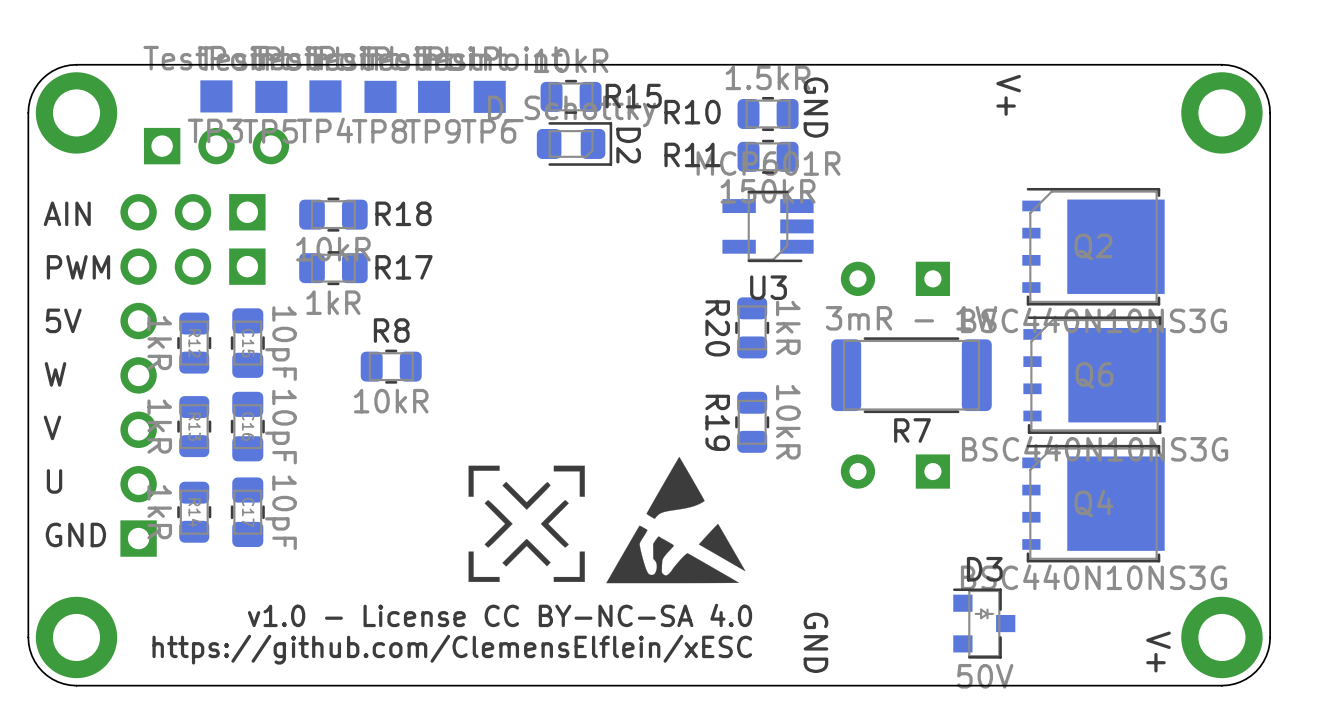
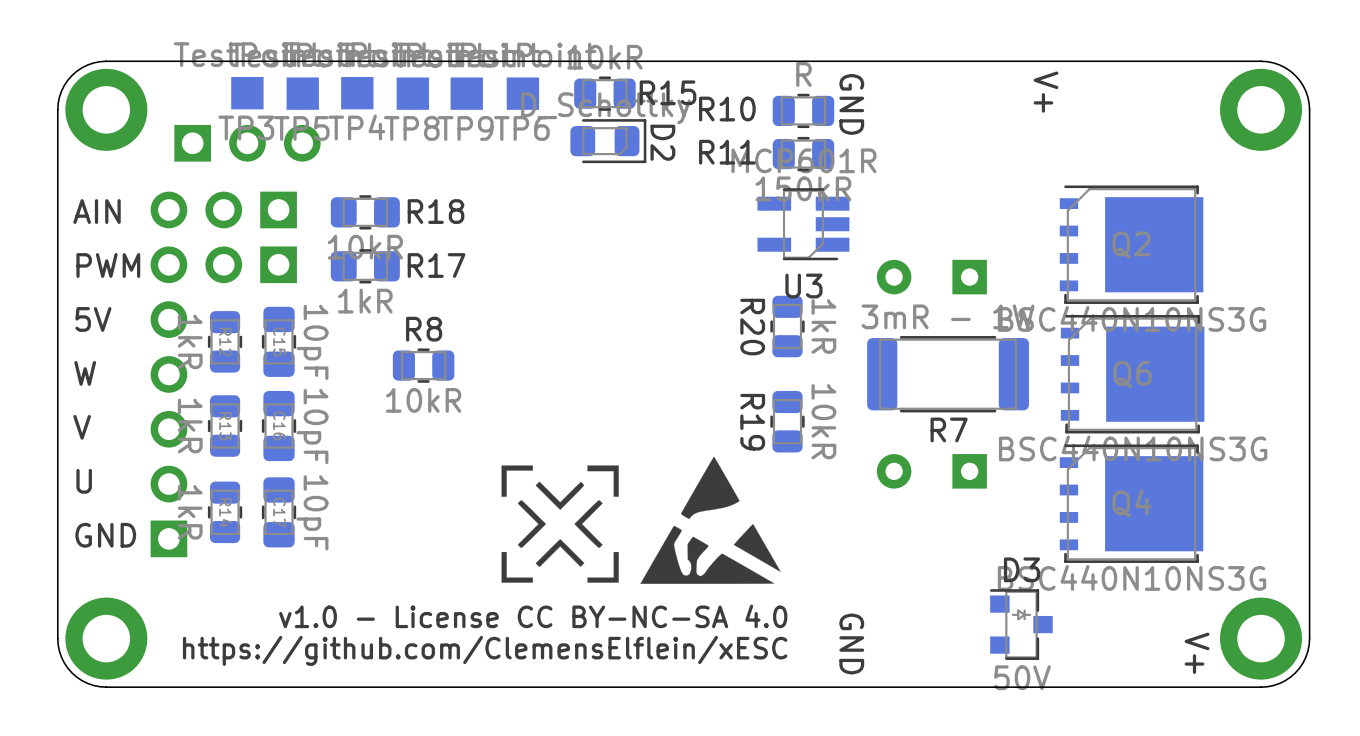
R10 value: 1.5kR (768, 77) -> R (803, 74)

